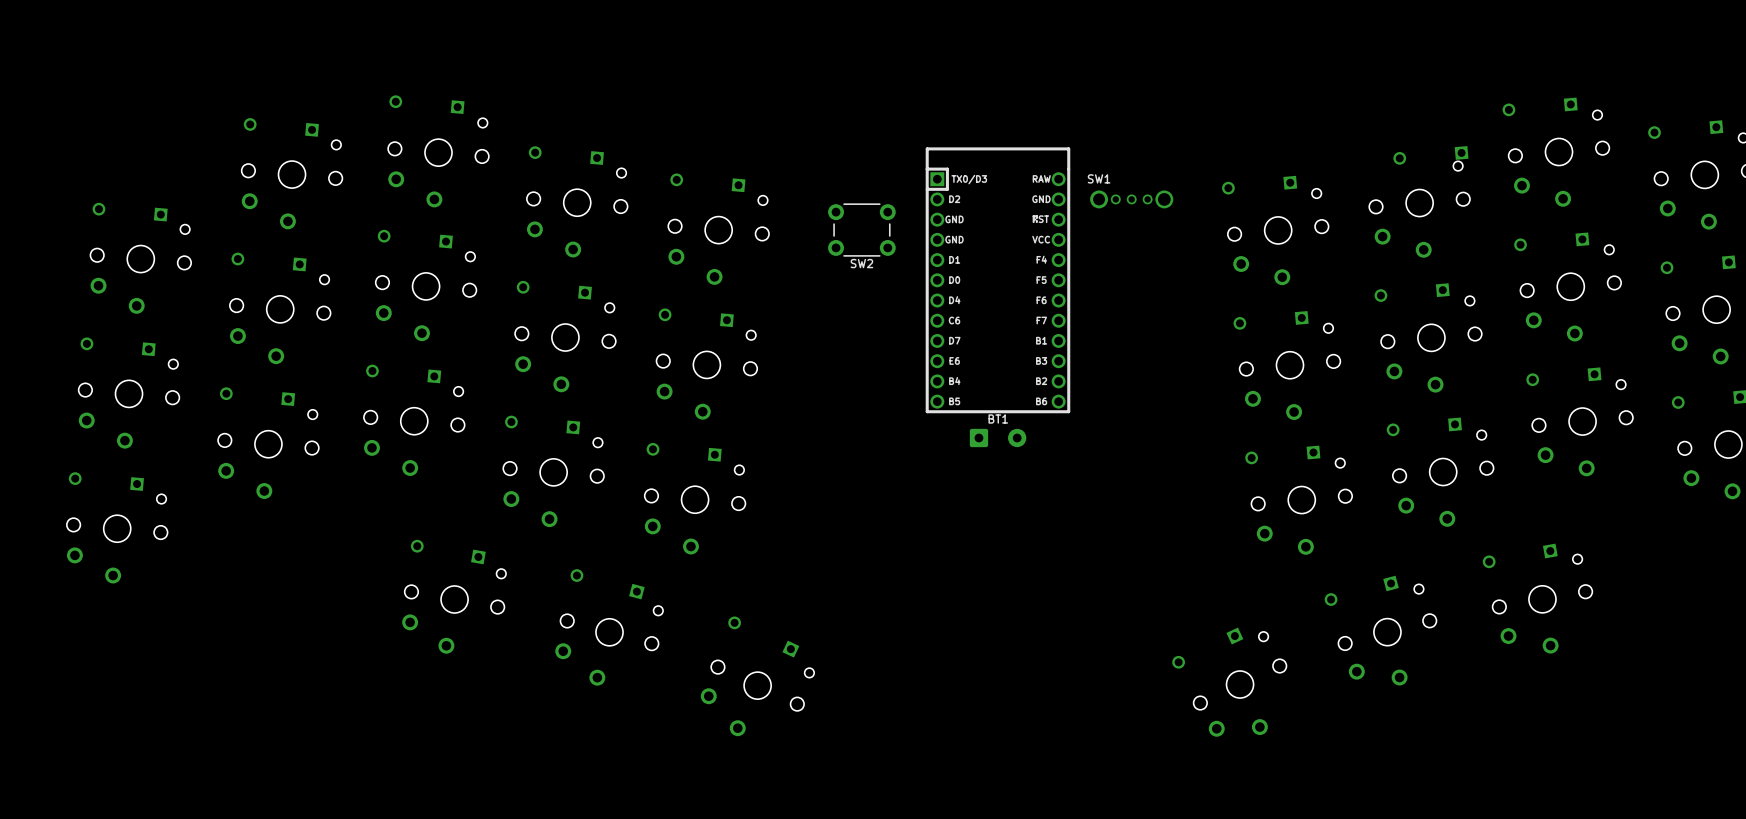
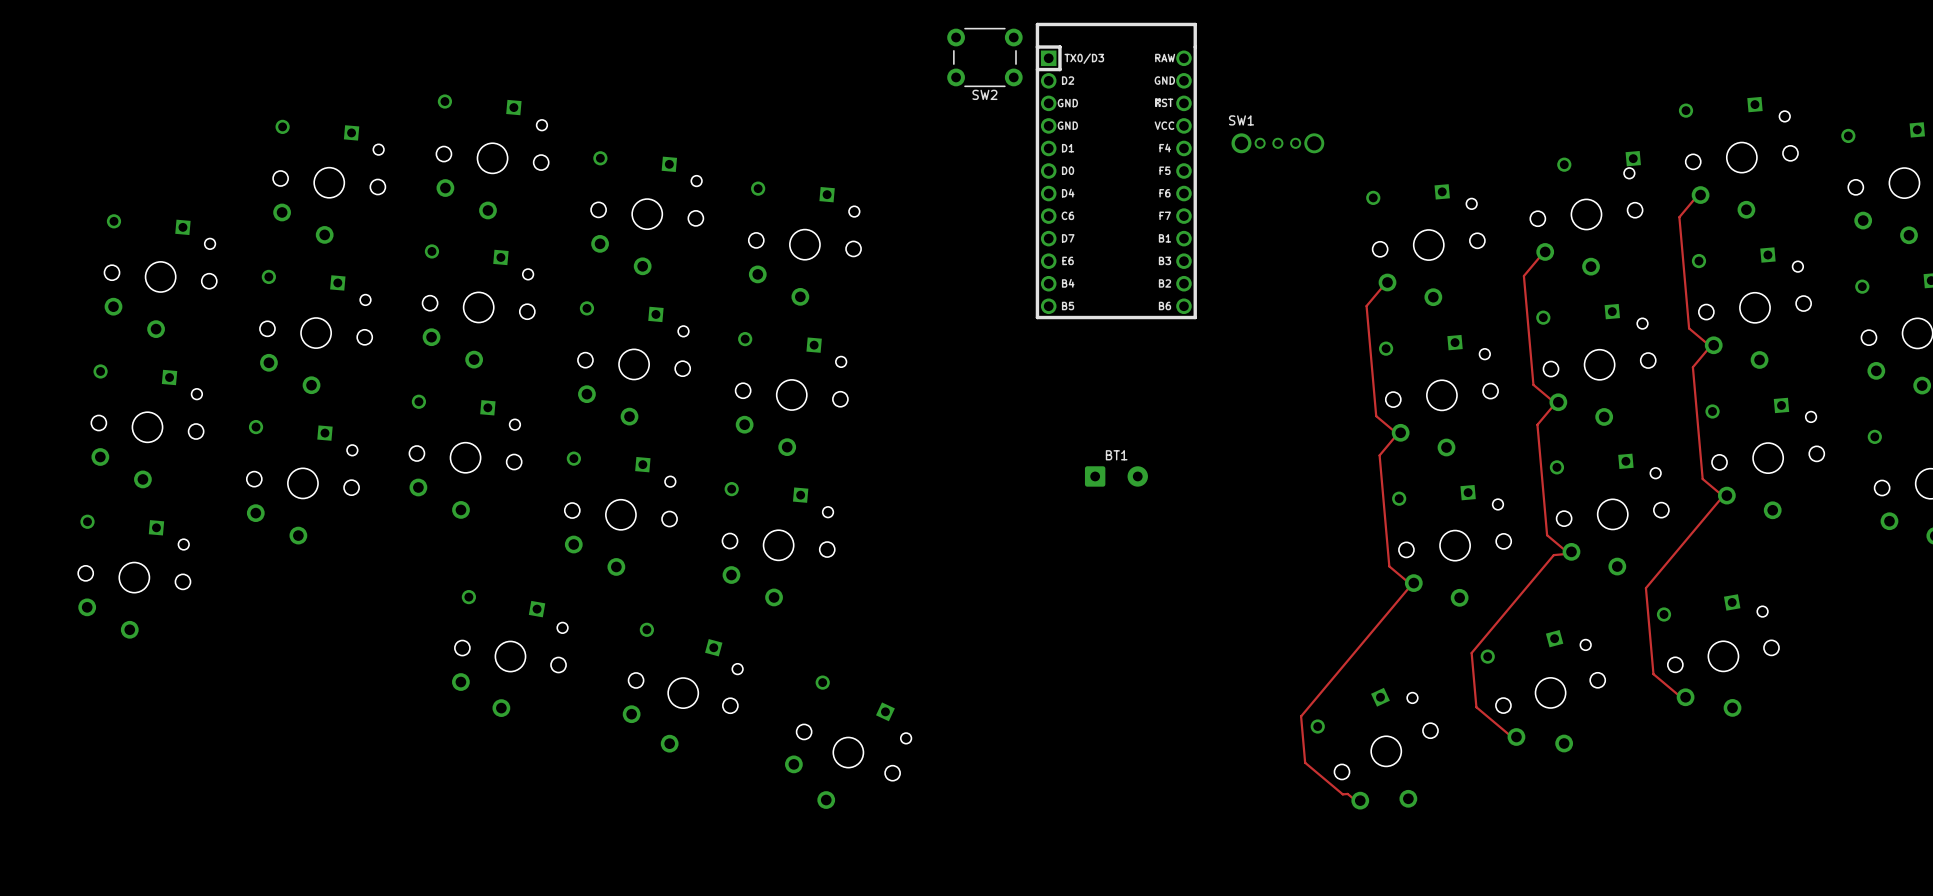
track: none -> (1696, 196) (1679, 217) (1689, 328) (1710, 346)
SW1 position: (1131, 199) -> (1277, 143)
SW2 position: (861, 230) -> (984, 57)
track: none -> (1542, 254) (1523, 276) (1533, 384) (1555, 403) (1537, 424) (1547, 535) (1568, 553)
track: none -> (1384, 284) (1366, 306) (1376, 416) (1397, 434)
part position: (997, 280) -> (1116, 171)
track: none -> (1710, 346) (1692, 367) (1702, 479) (1724, 497)
track: none -> (1396, 435) (1379, 455) (1389, 566) (1410, 584)
track: none -> (1721, 498) (1645, 588) (1653, 674) (1682, 698)
track: none -> (1567, 553) (1553, 555) (1471, 653) (1476, 707) (1513, 738)
track: none -> (1410, 585) (1301, 716) (1305, 762) (1342, 794) (1347, 793) (1357, 802)

